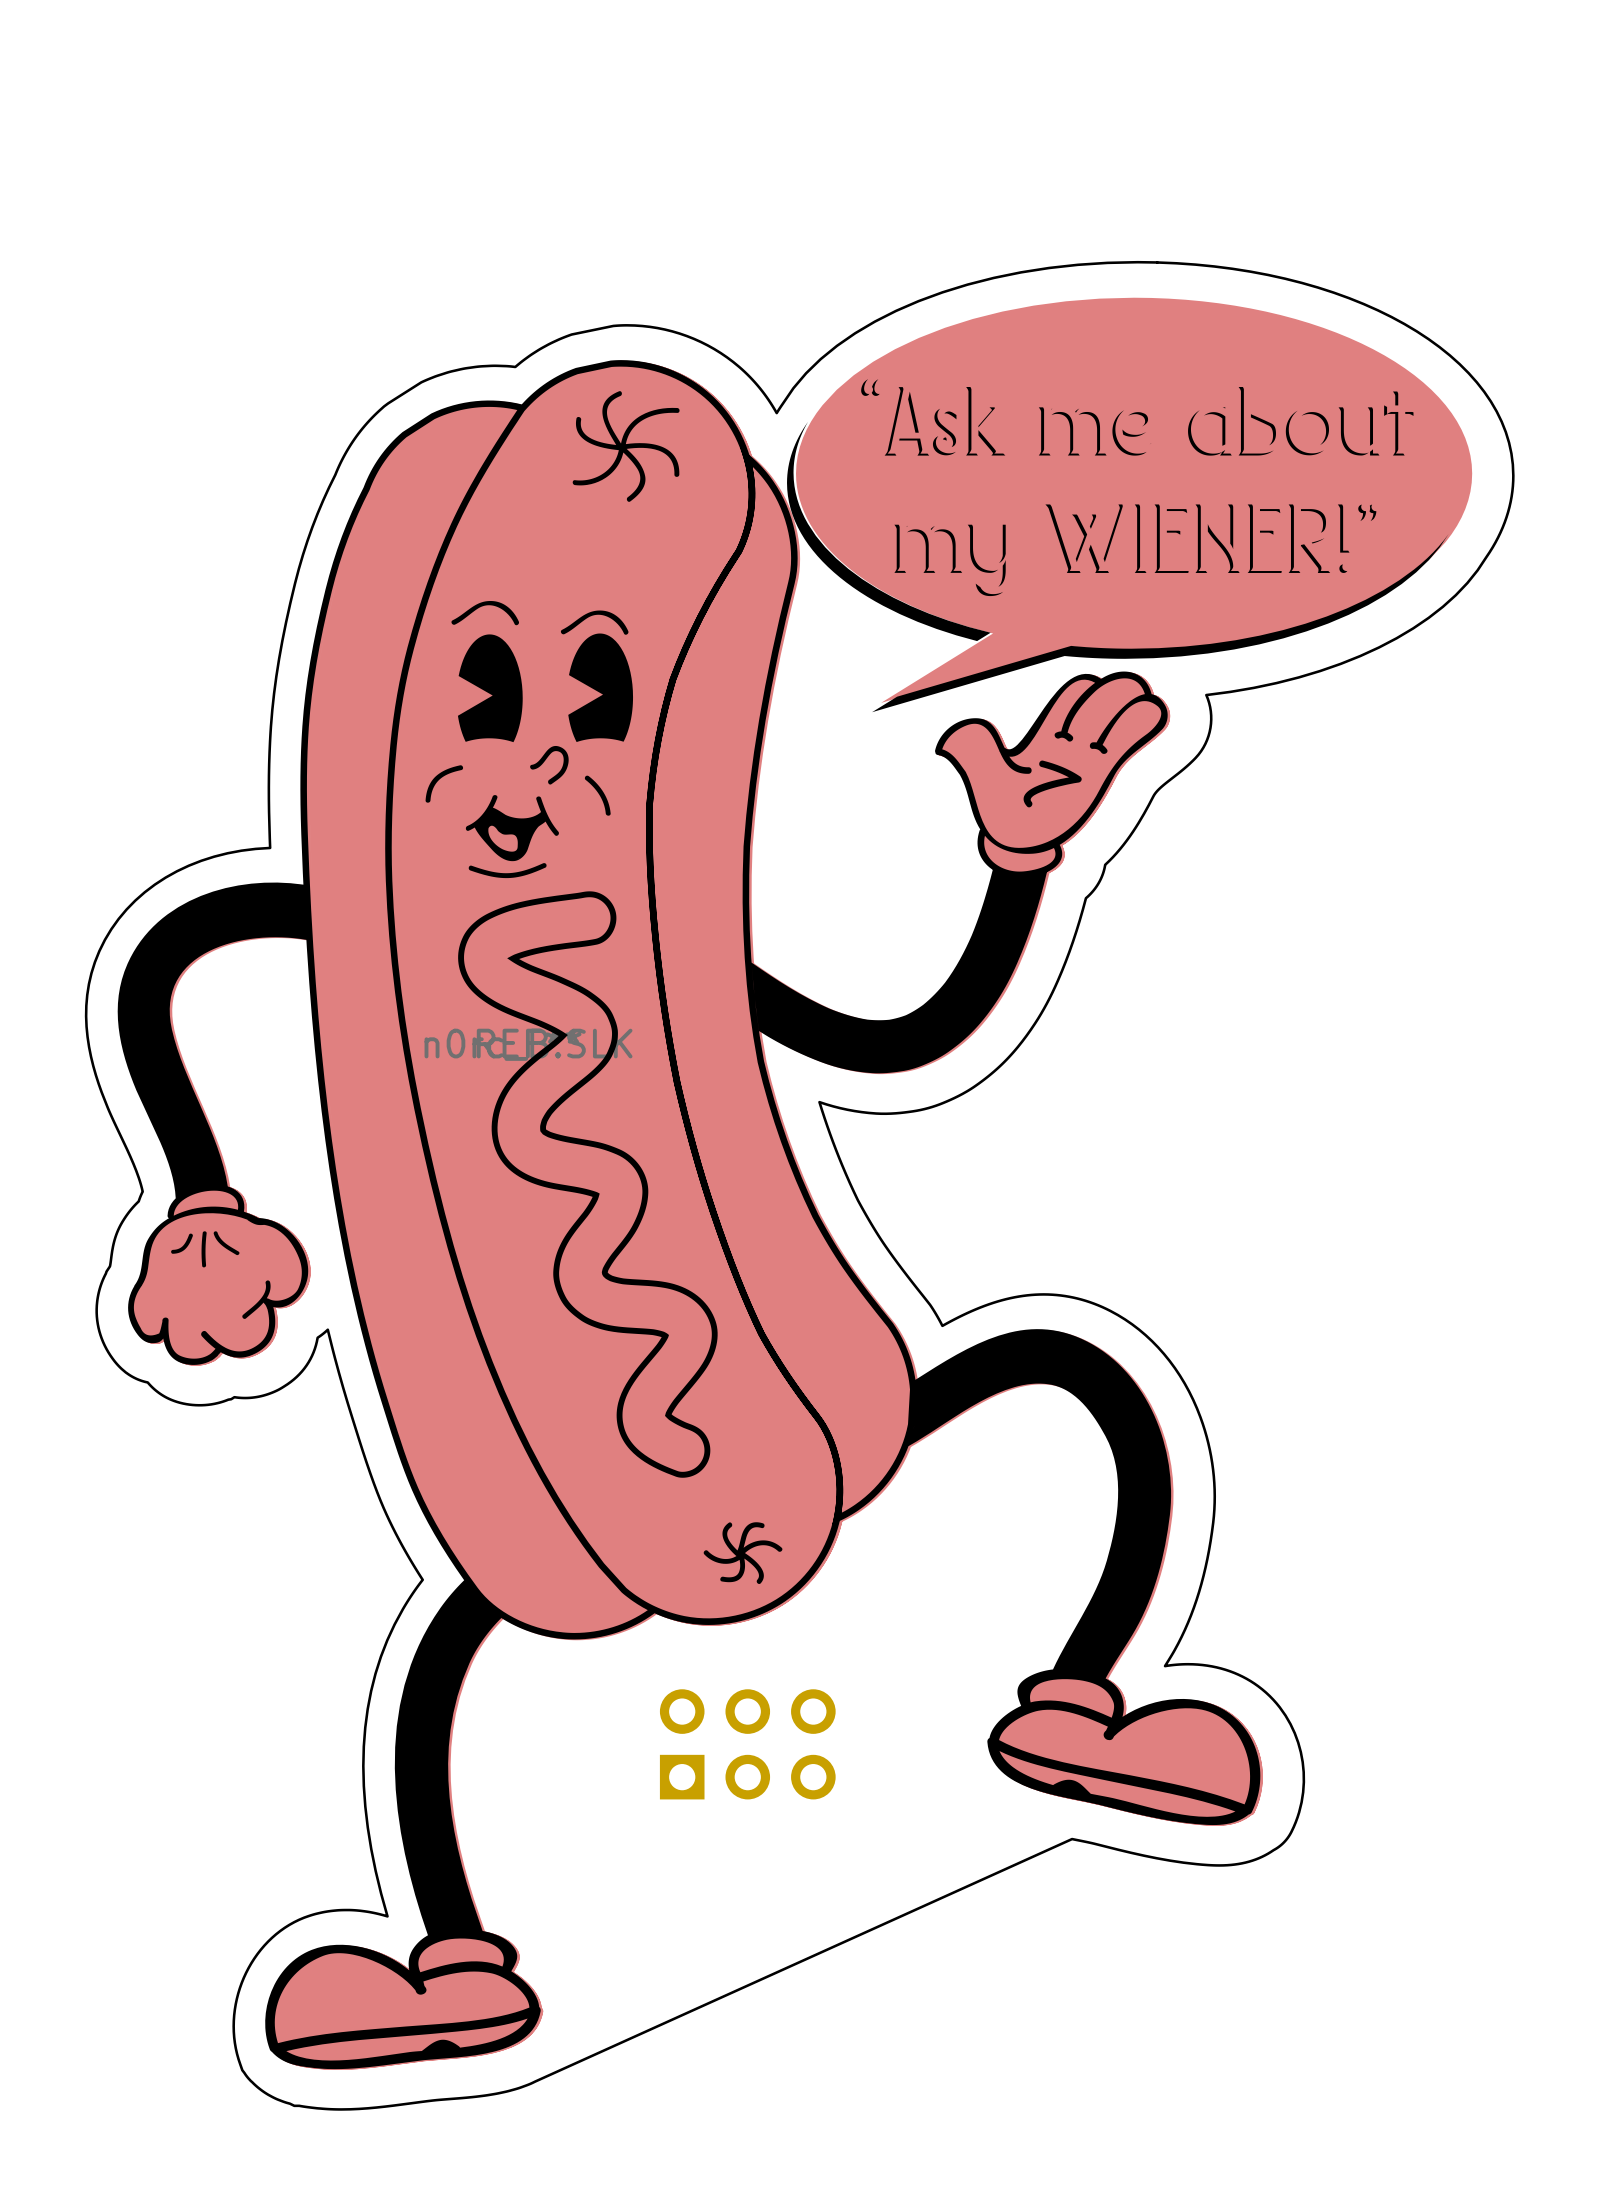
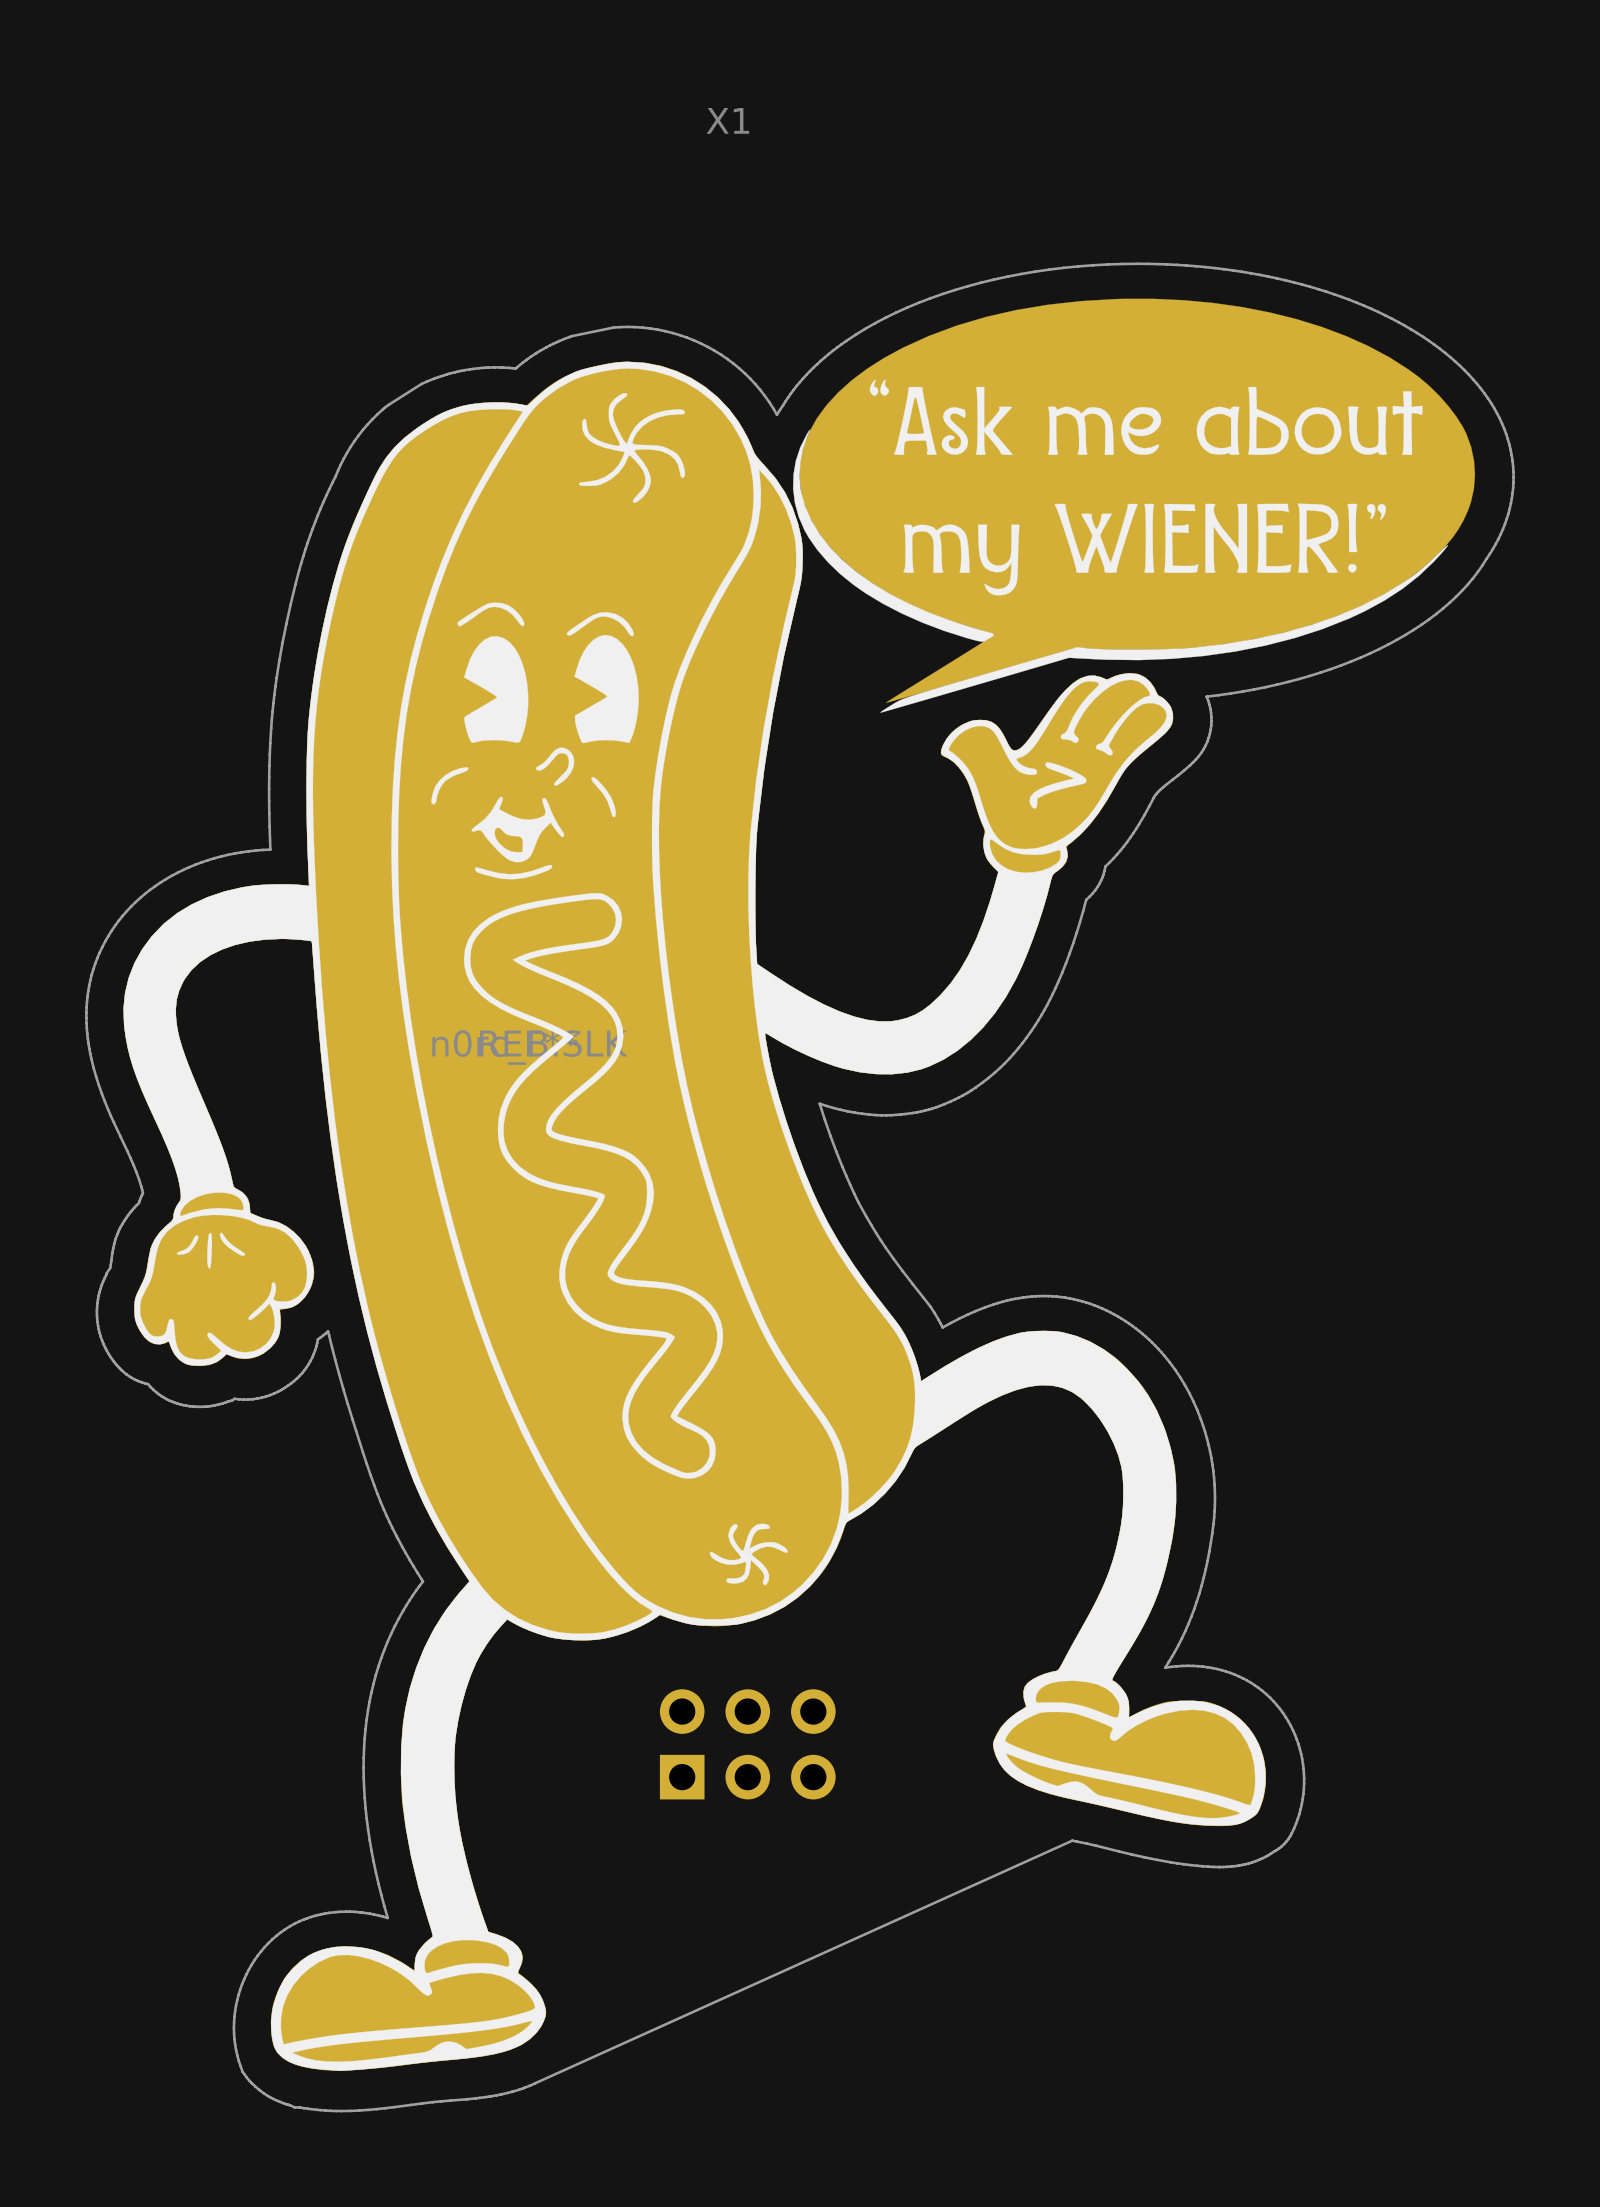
part: (799, 1185) -> none
X1: none -> (799, 1187)

